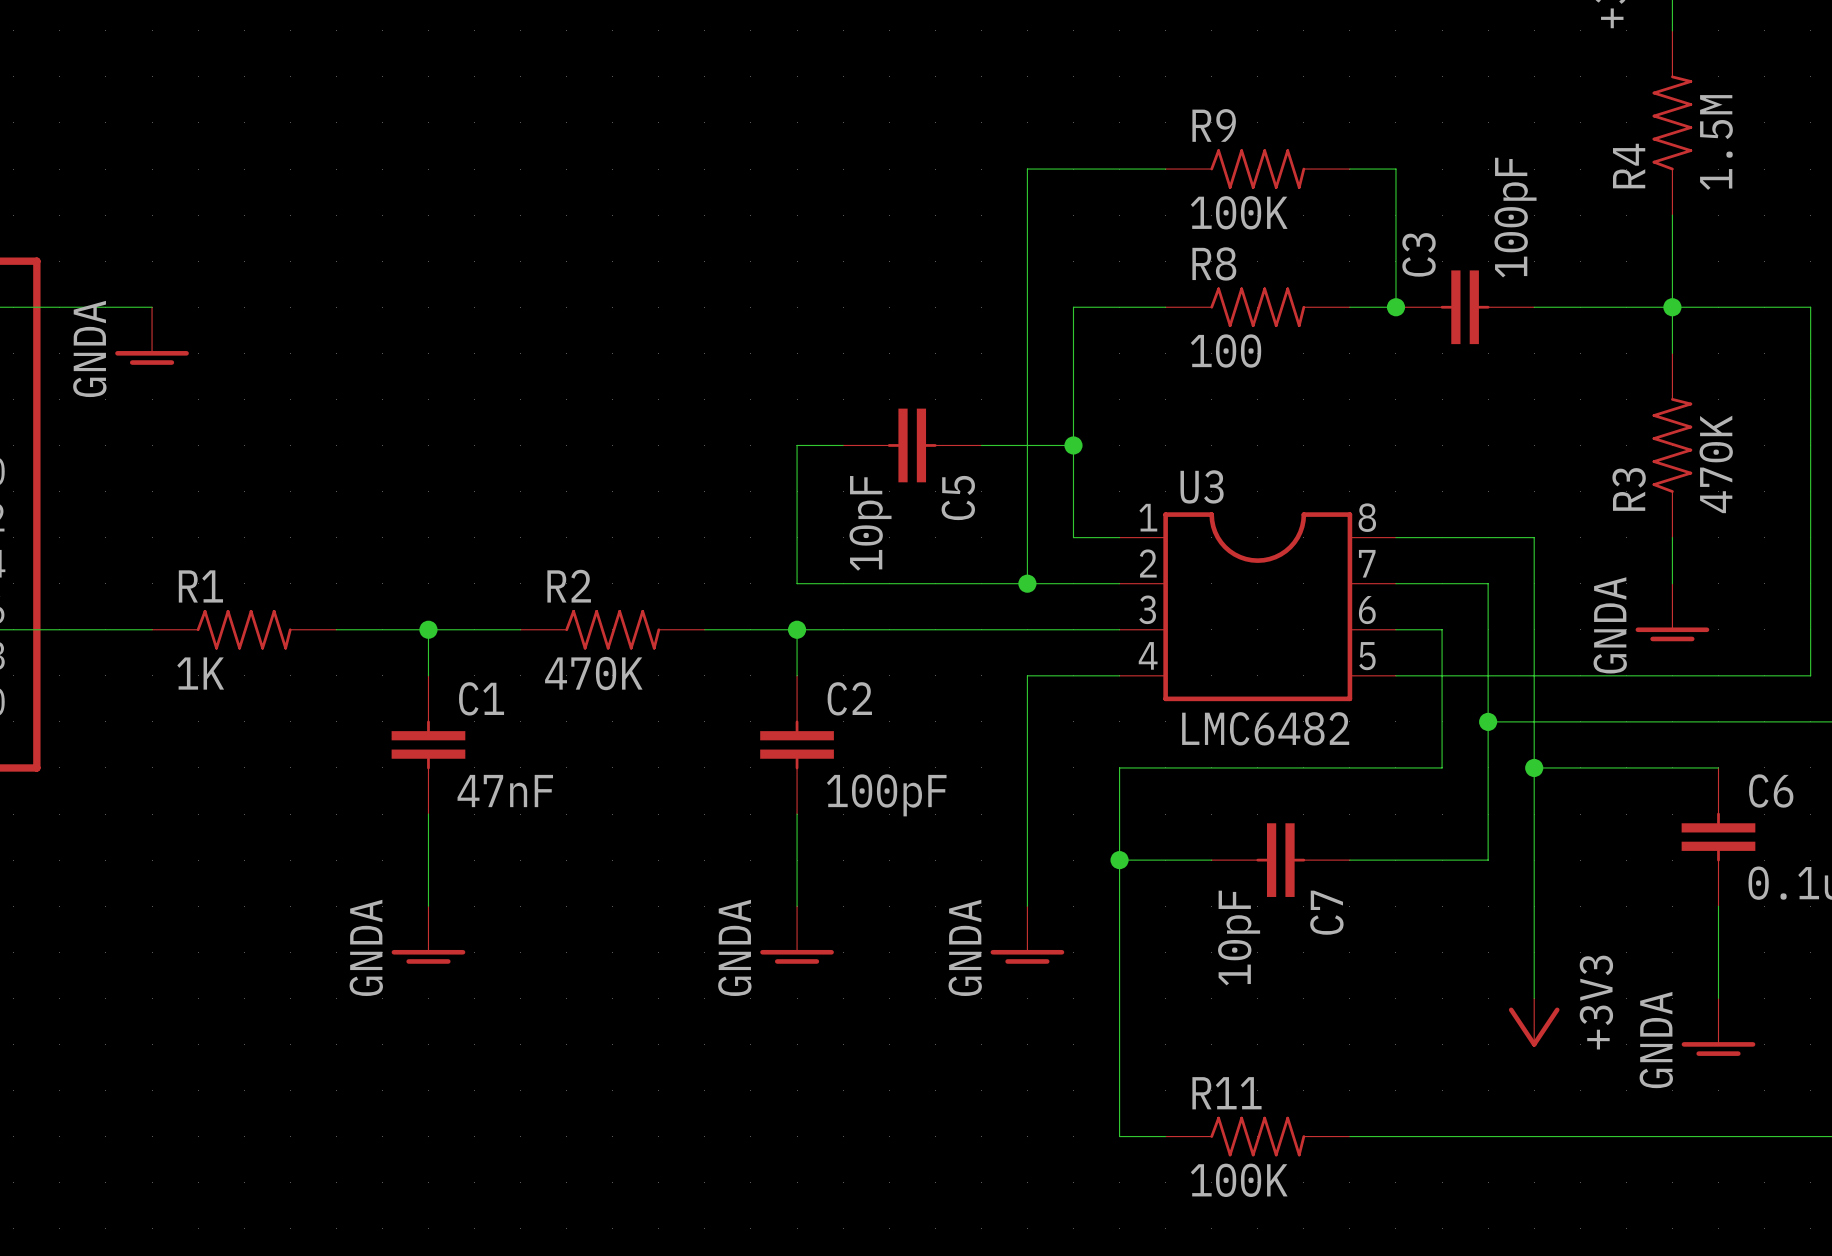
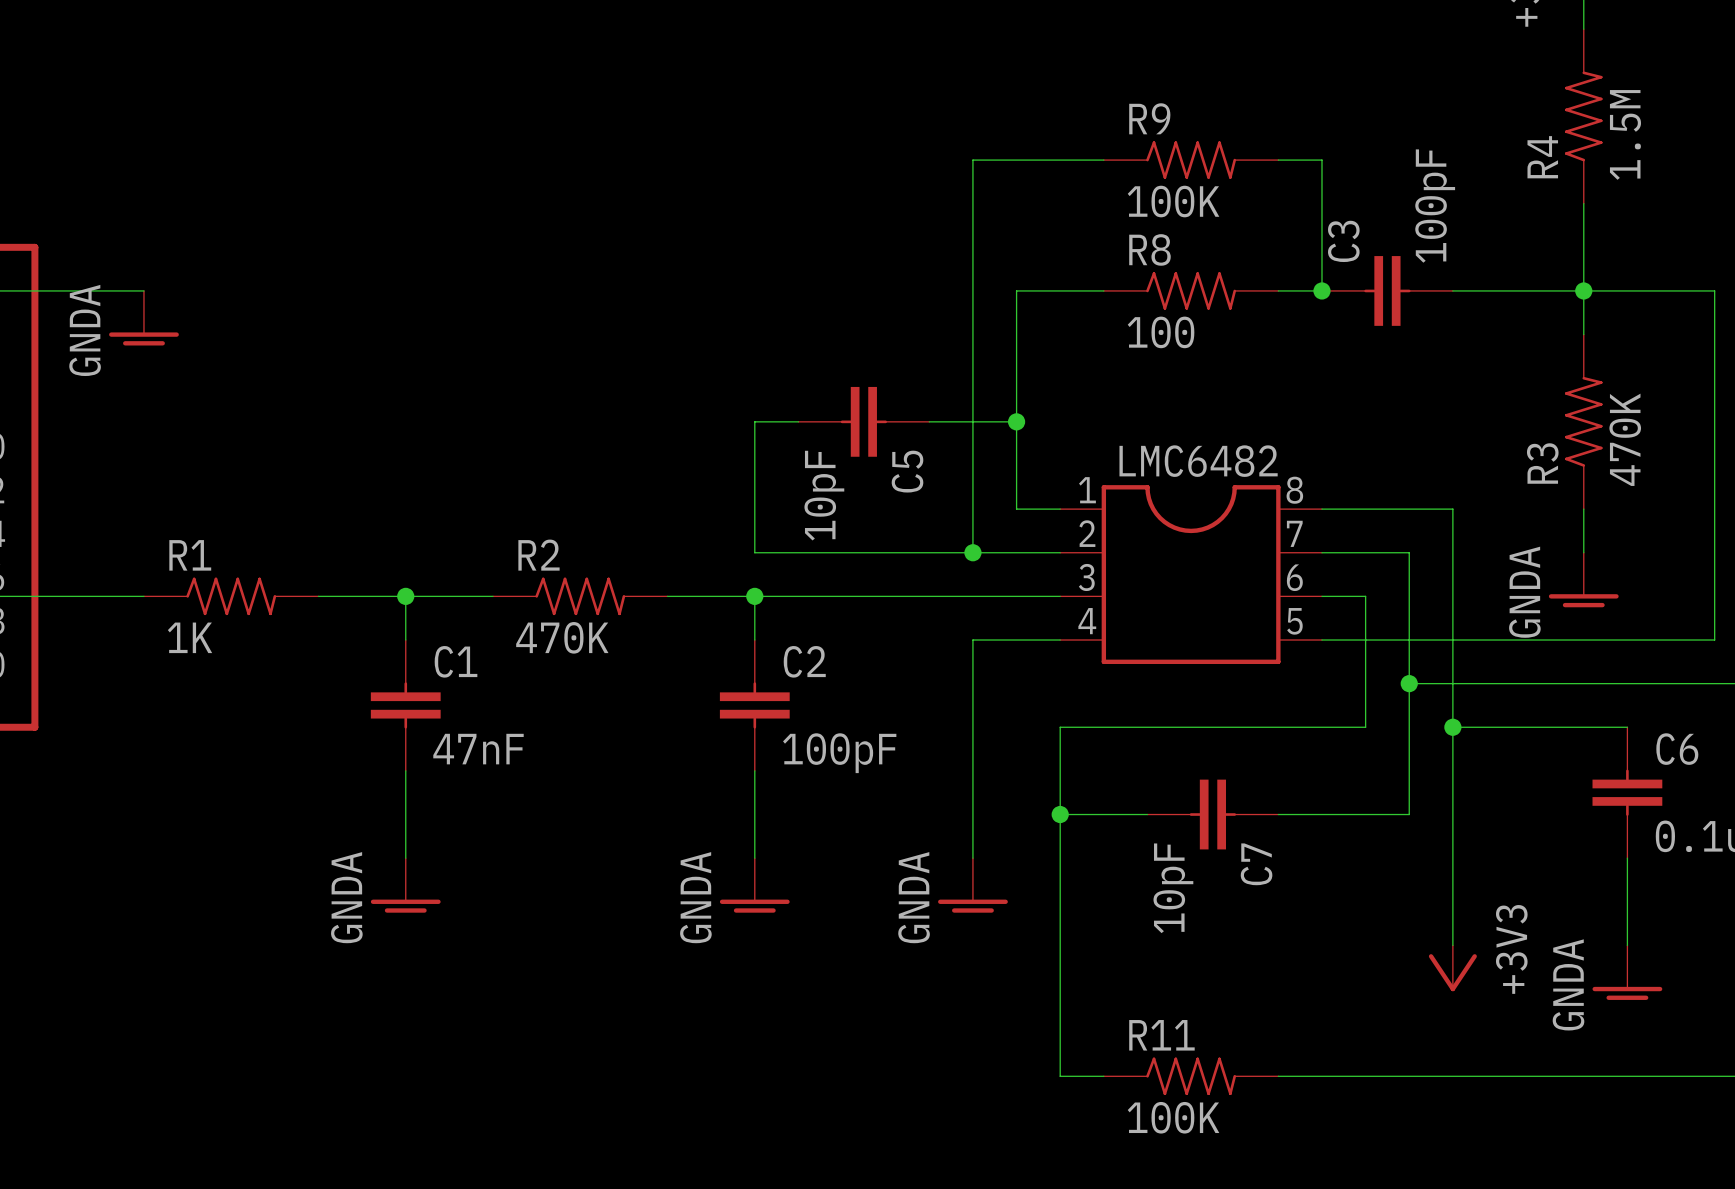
U3 name: U3 (1202, 486) -> LMC6482 (1198, 461)
U3 value: LMC6482 (1265, 728) -> none

